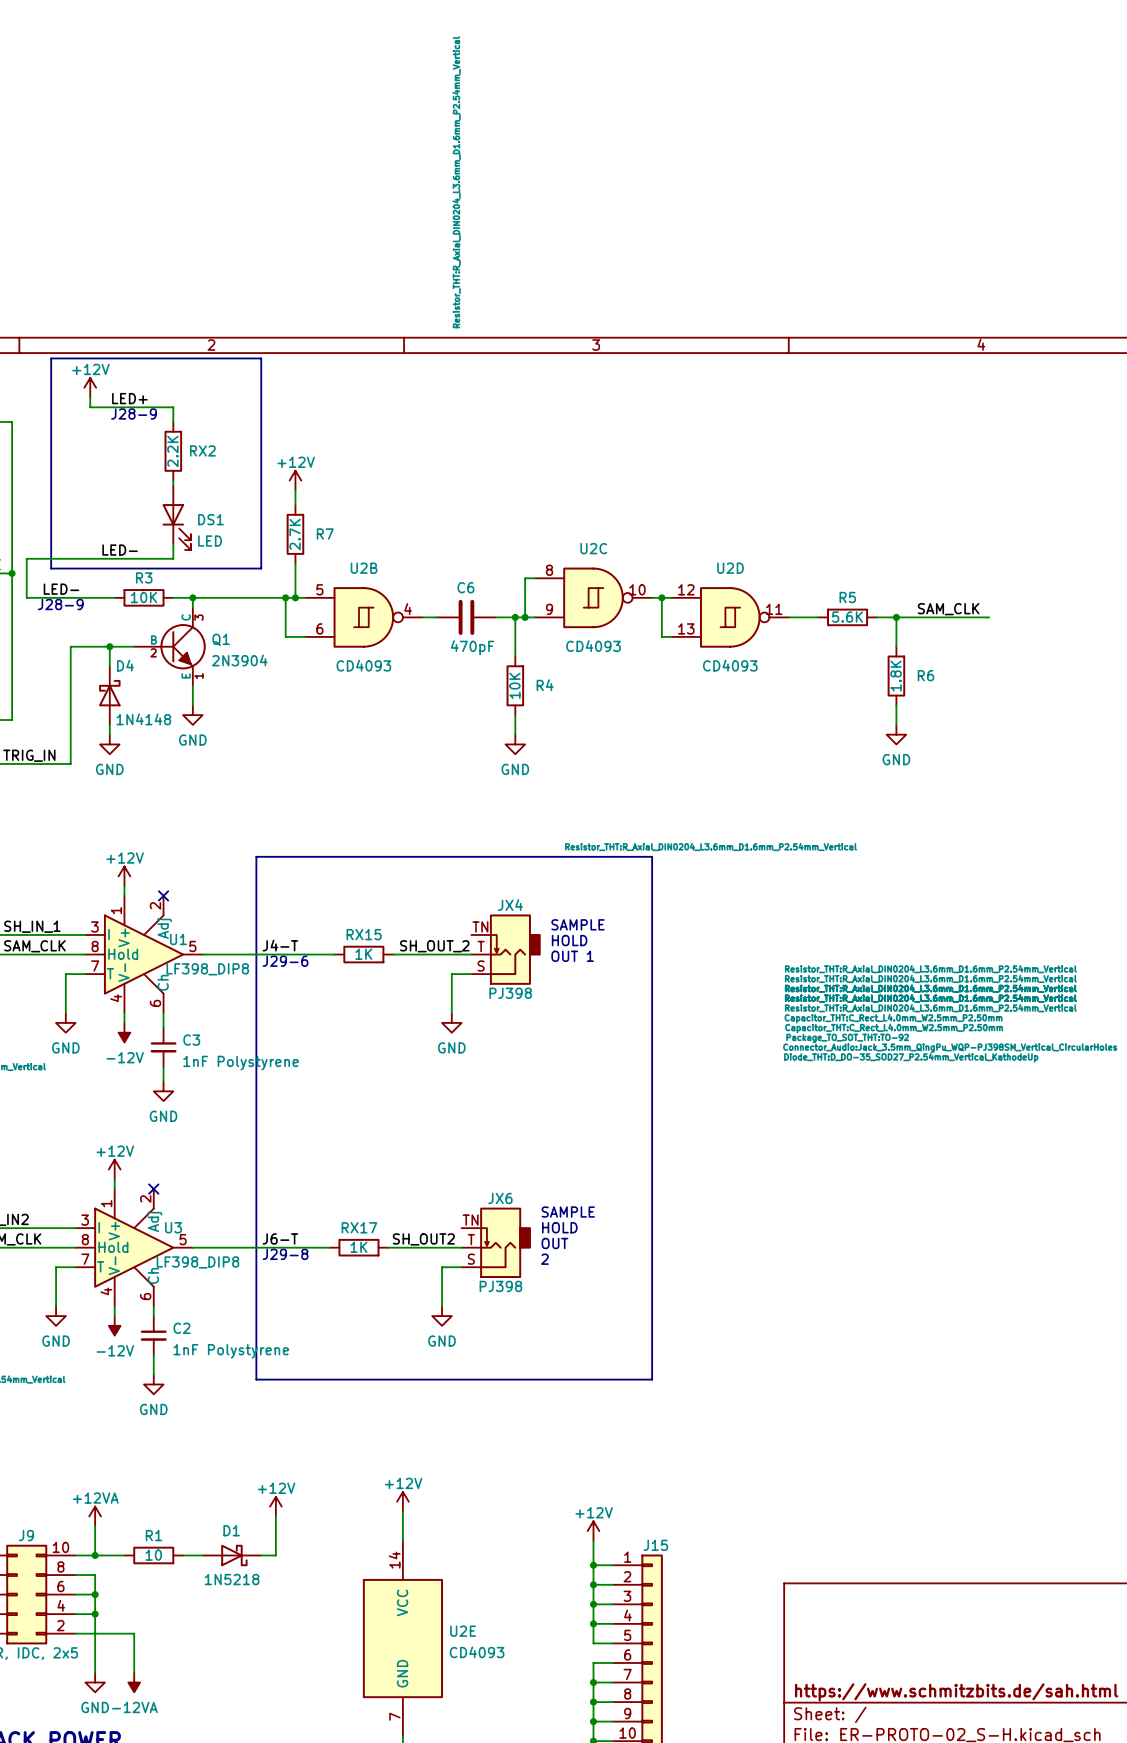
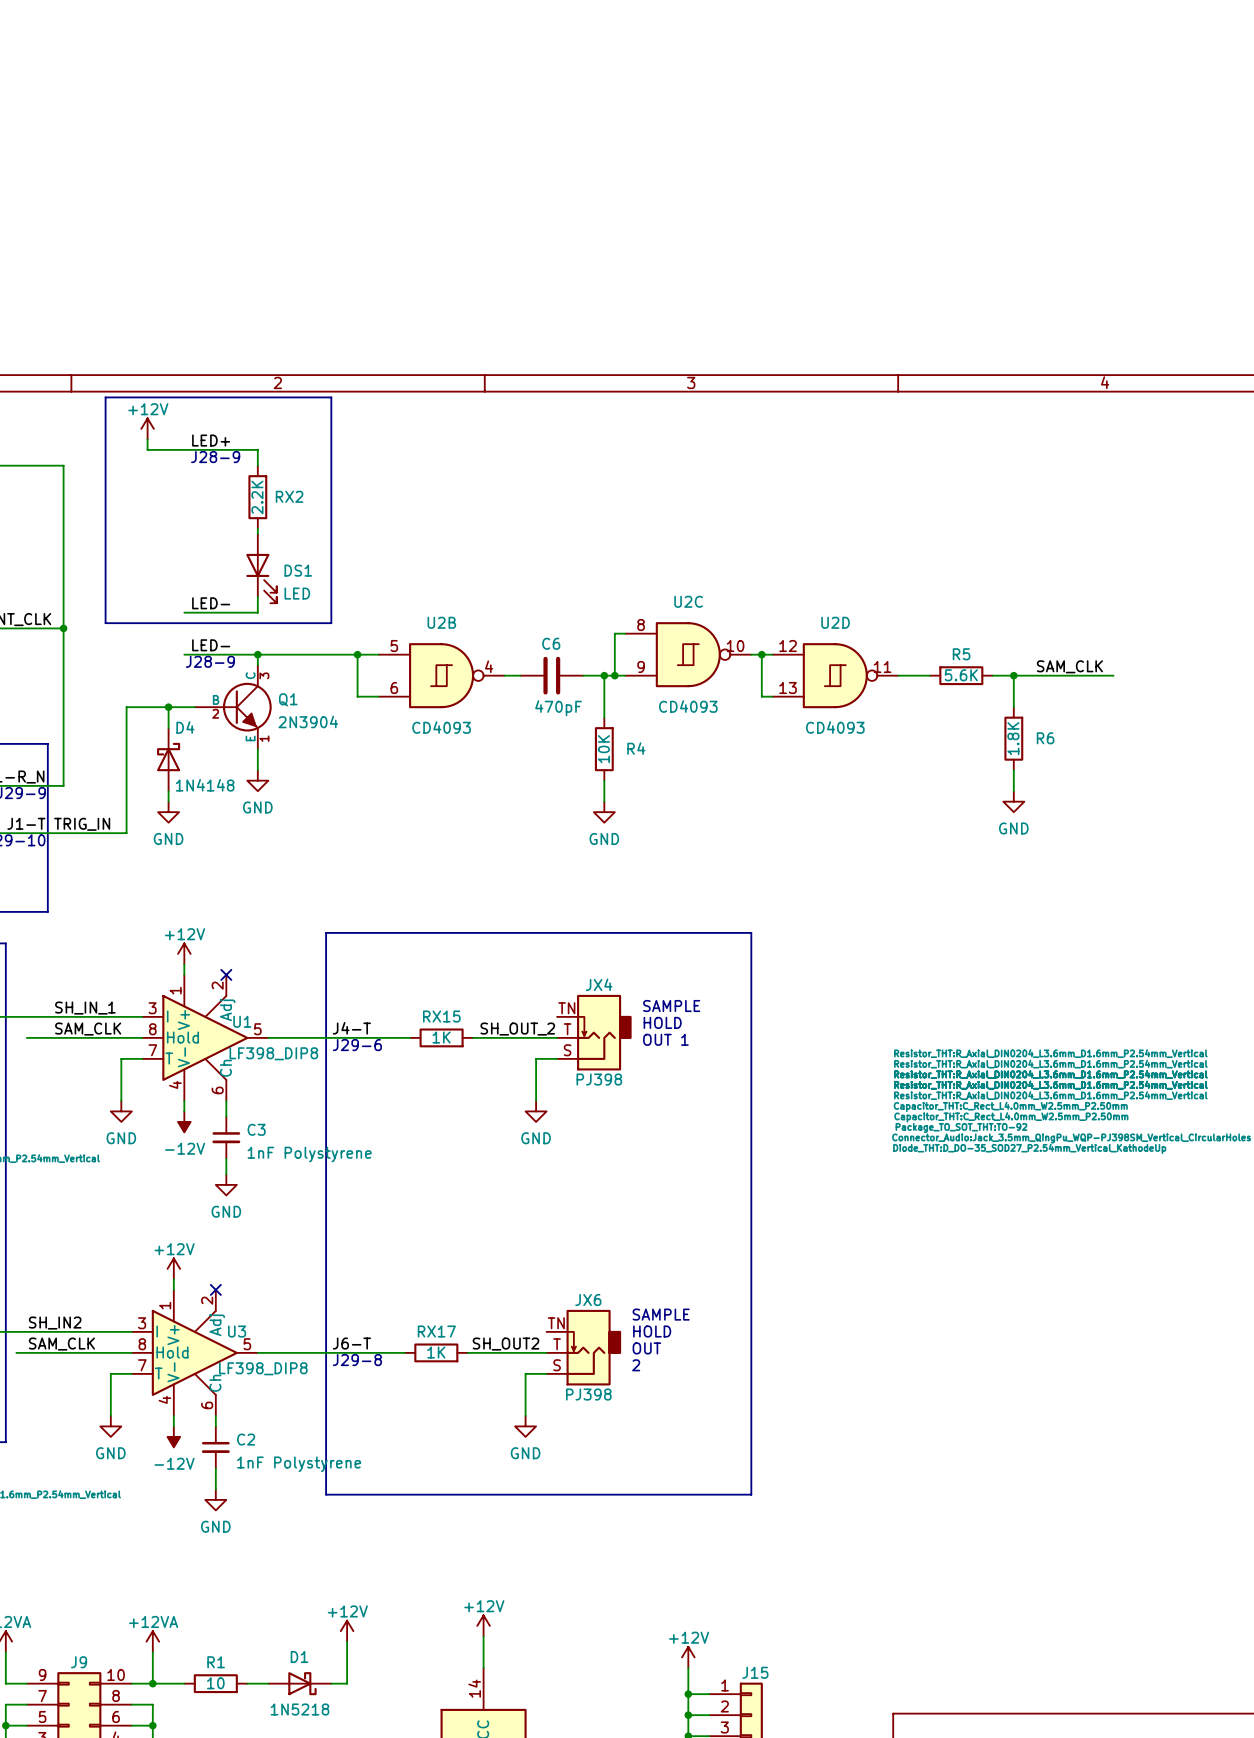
label position: LED+ (129, 398) -> LED+ (211, 440)
wire: (173, 407) (173, 421) -> (236, 449) (257, 449) (257, 465)
text position: J28-9 (134, 413) -> J28-9 (215, 457)
RX2 position: (173, 451) -> (257, 497)
wire: (173, 480) (173, 485) -> (257, 528) (257, 533)
power symbol: +12V (295, 480) -> none
wire: (295, 490) (295, 505) -> none
DS1 position: (176, 517) -> (261, 568)
R7: 2.7K (295, 534) -> none
wire: (173, 544) (173, 558) -> (257, 596) (257, 612) (236, 612)
label position: LED- (120, 550) -> LED- (211, 603)
wire: (124, 558) (26, 558) (26, 597) (114, 597) -> none
wire: (295, 563) (295, 597) -> none
label: LED- (61, 589) -> none
label: none -> LED- (211, 645)
wire: none -> (184, 654) (236, 654)
R3: 10K (143, 597) -> none
junction: (295, 597) -> none
text position: J28-9 (60, 604) -> J28-9 (210, 661)

